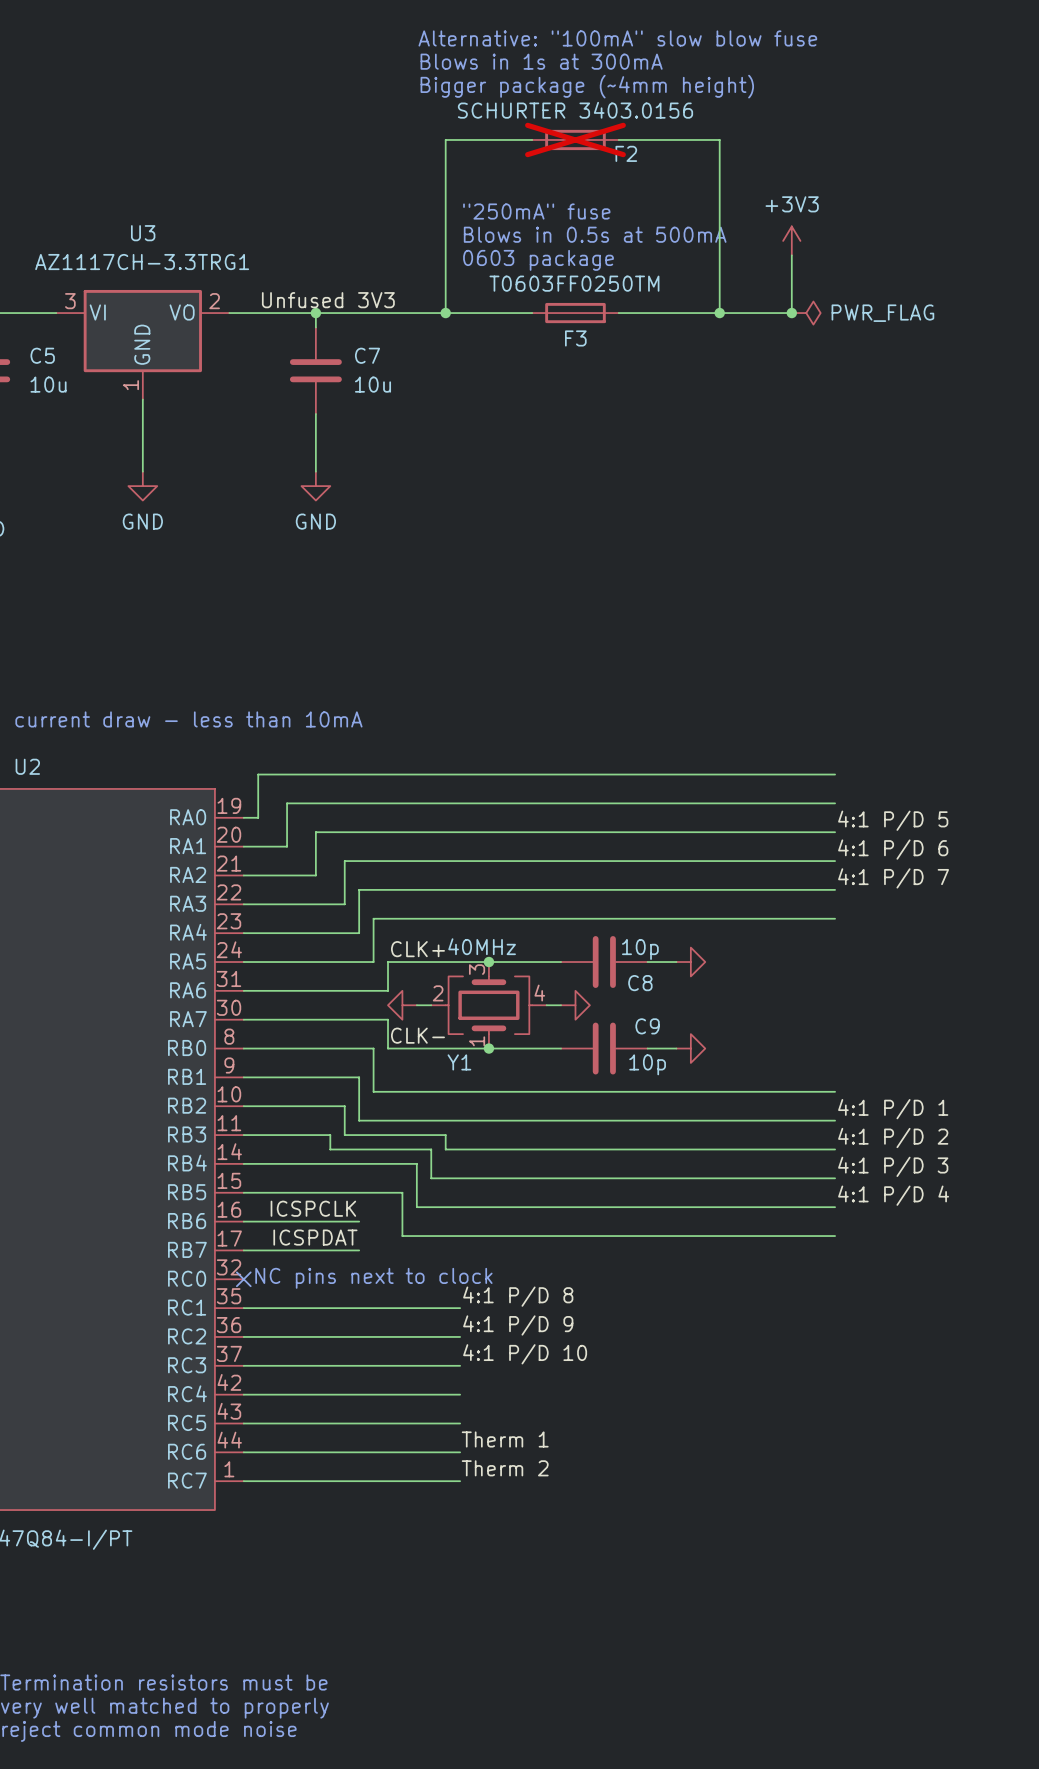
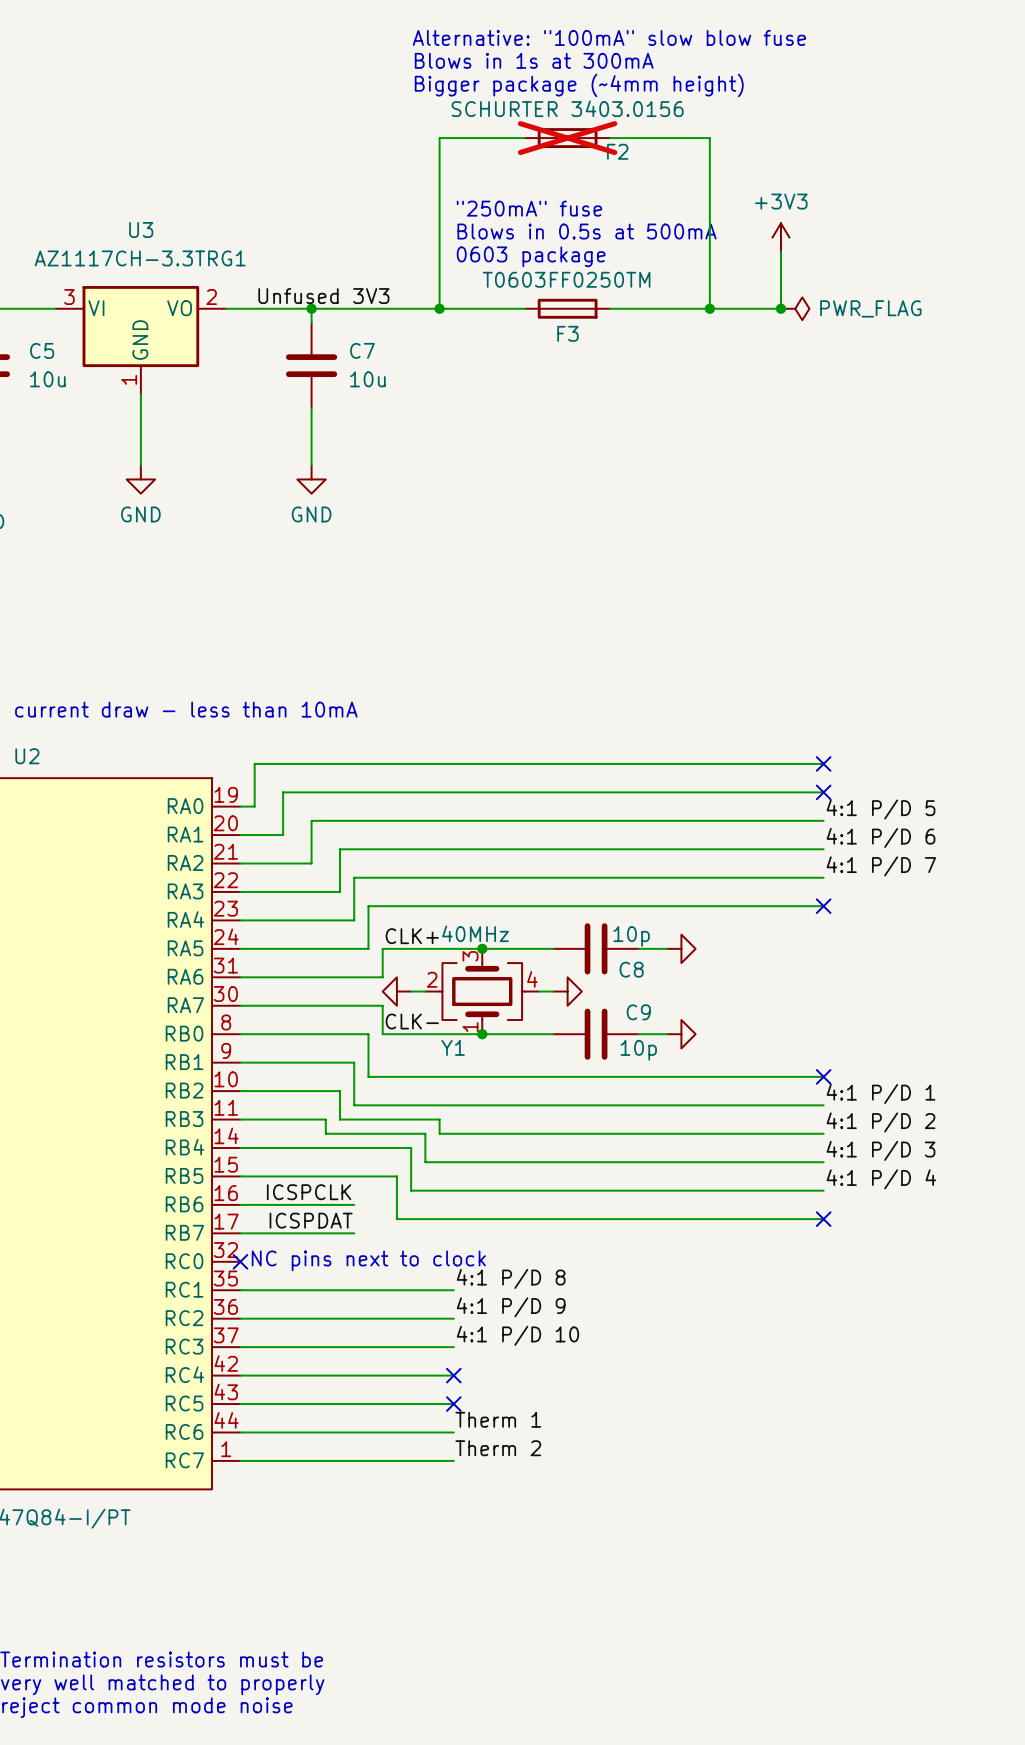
no-connect mark: none -> (823, 763)
no-connect mark: none -> (823, 792)
no-connect mark: none -> (823, 906)
no-connect mark: none -> (823, 1076)
no-connect mark: none -> (823, 1219)
no-connect mark: none -> (453, 1375)
no-connect mark: none -> (453, 1404)

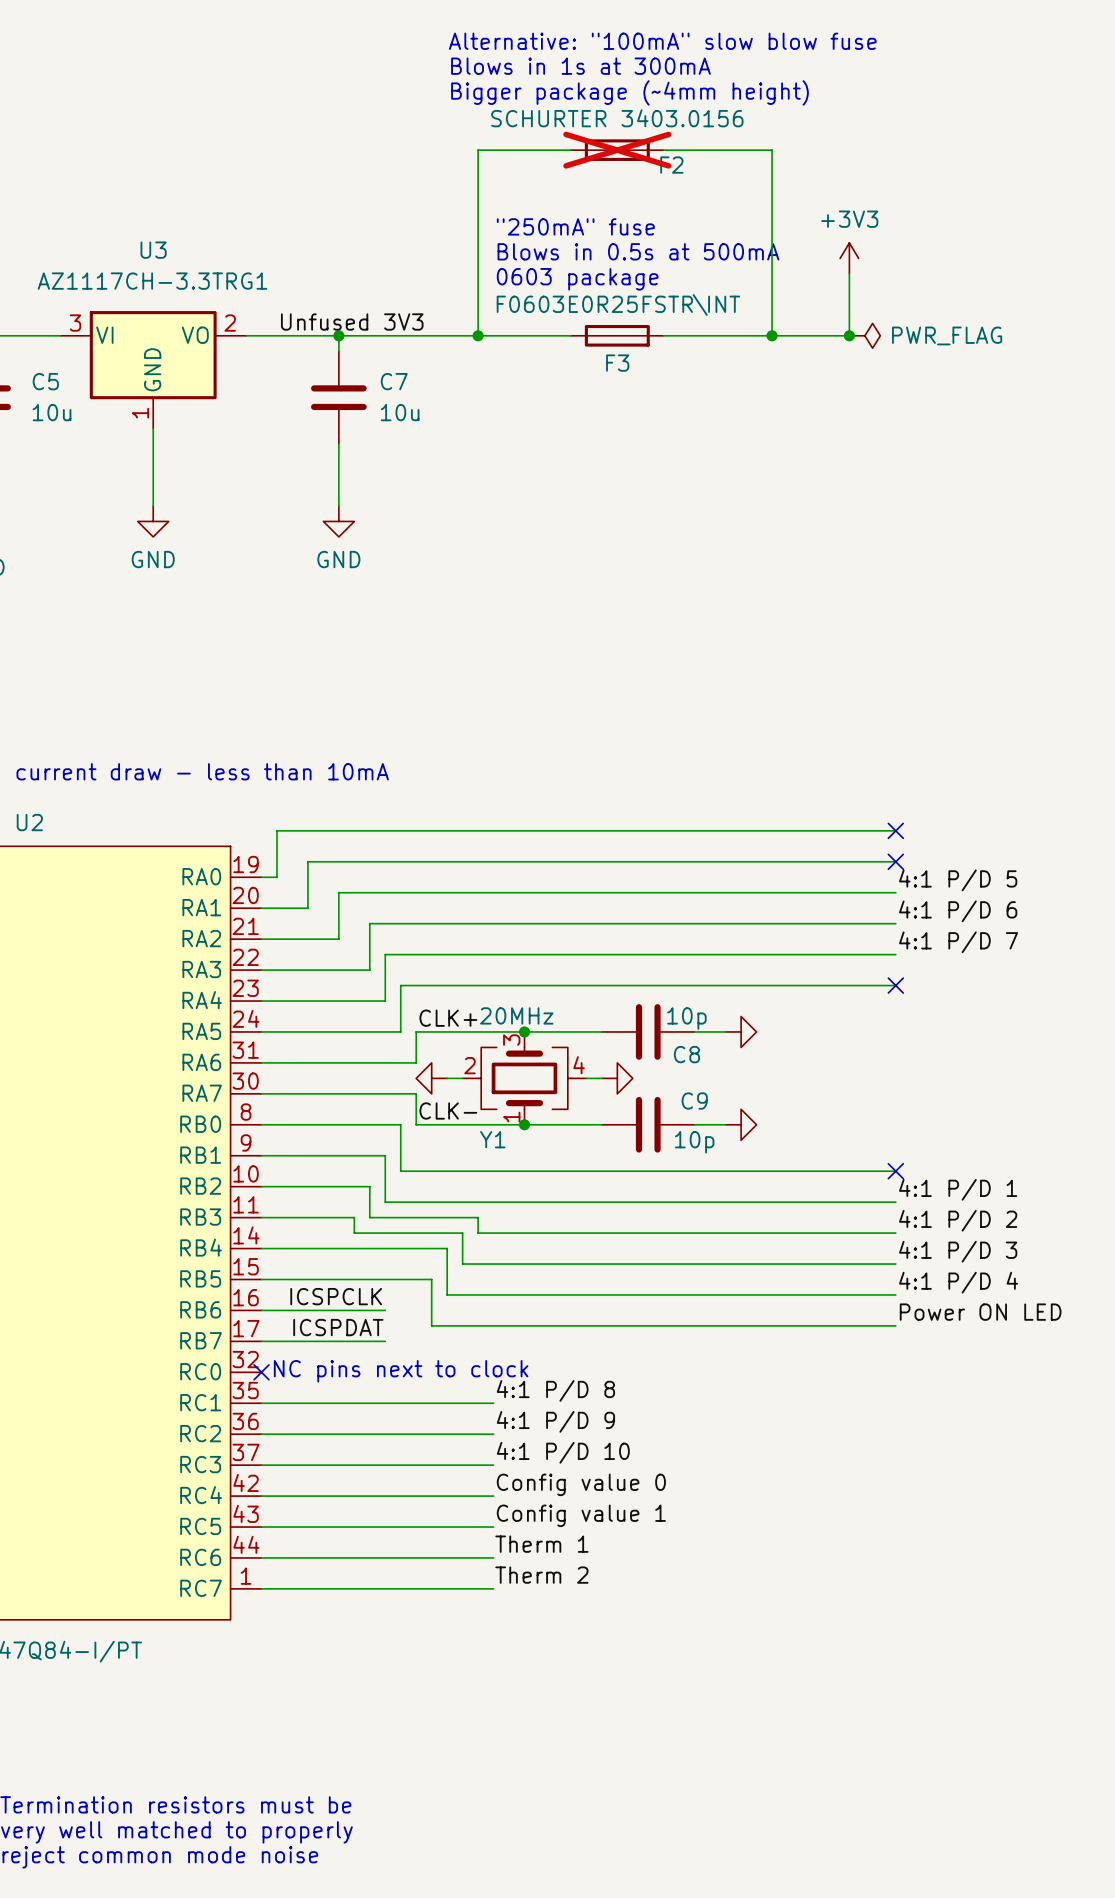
F3 value: T0603FF0250TM (566, 279) -> F0603E0R25FSTR\INT (618, 305)
Y1 value: 40MHz (475, 933) -> 20MHz (516, 1015)
label: none -> Power ON LED (980, 1312)
no-connect mark: (823, 1219) -> none
label: none -> Config value 0 (581, 1484)
no-connect mark: (453, 1375) -> none
label: none -> Config value 1 (581, 1515)
no-connect mark: (453, 1404) -> none

